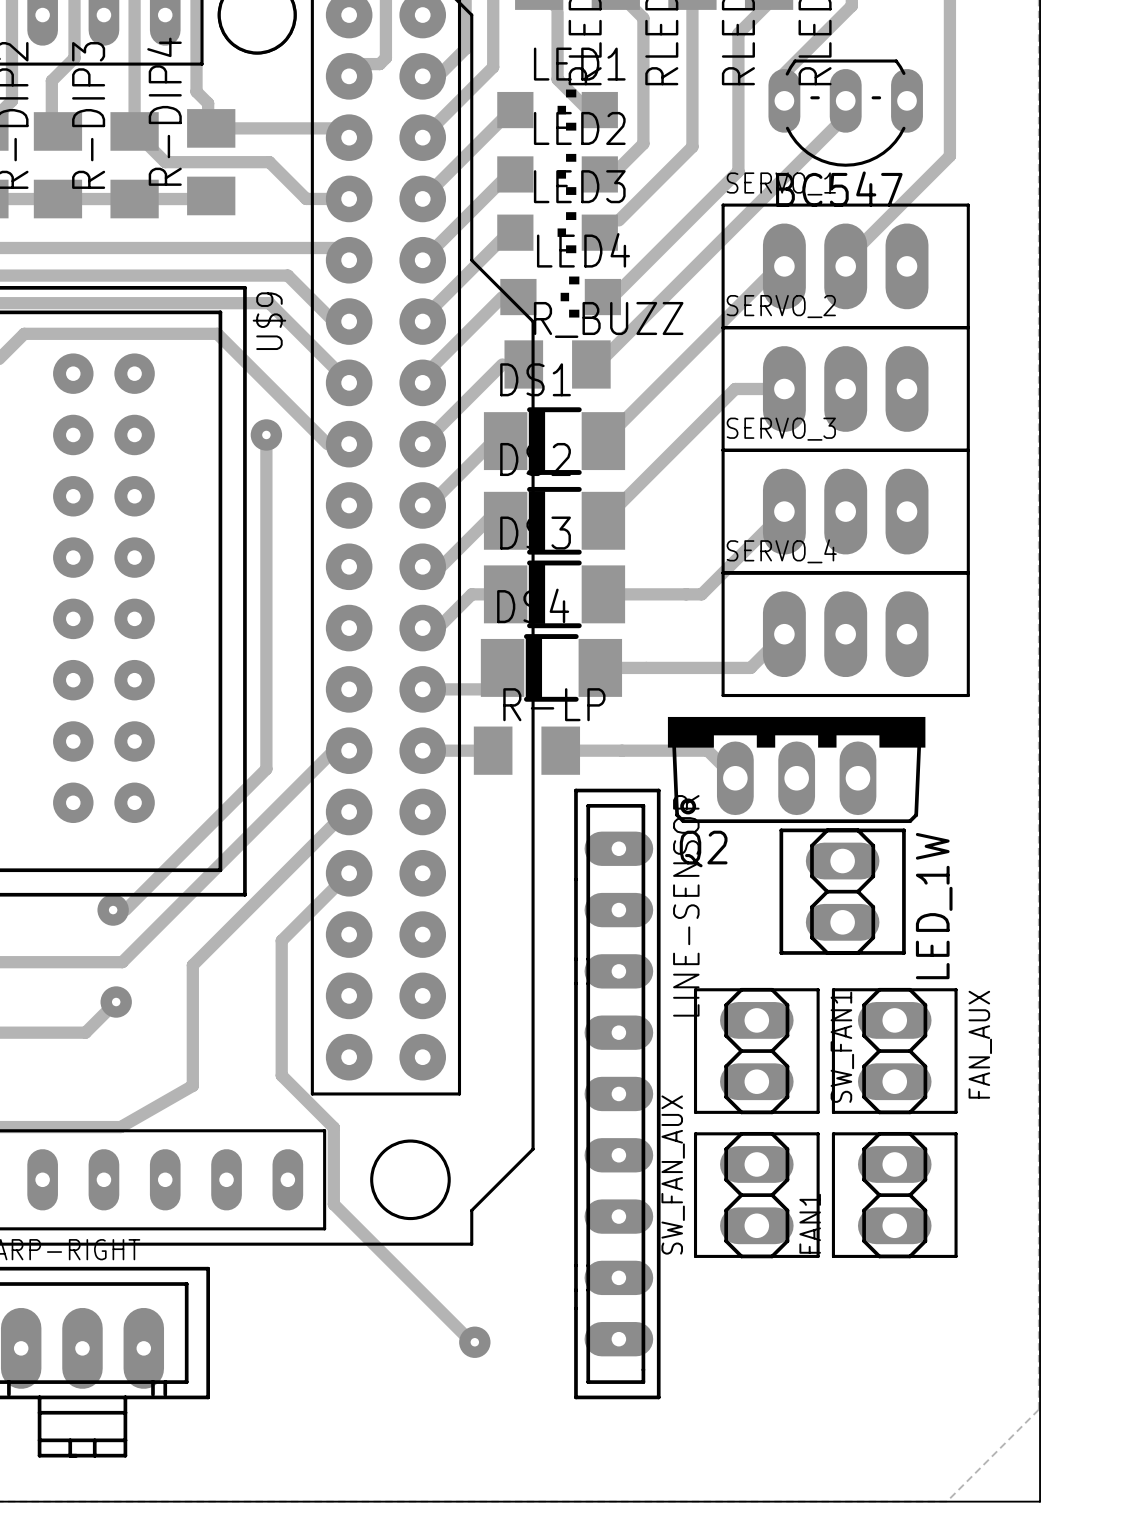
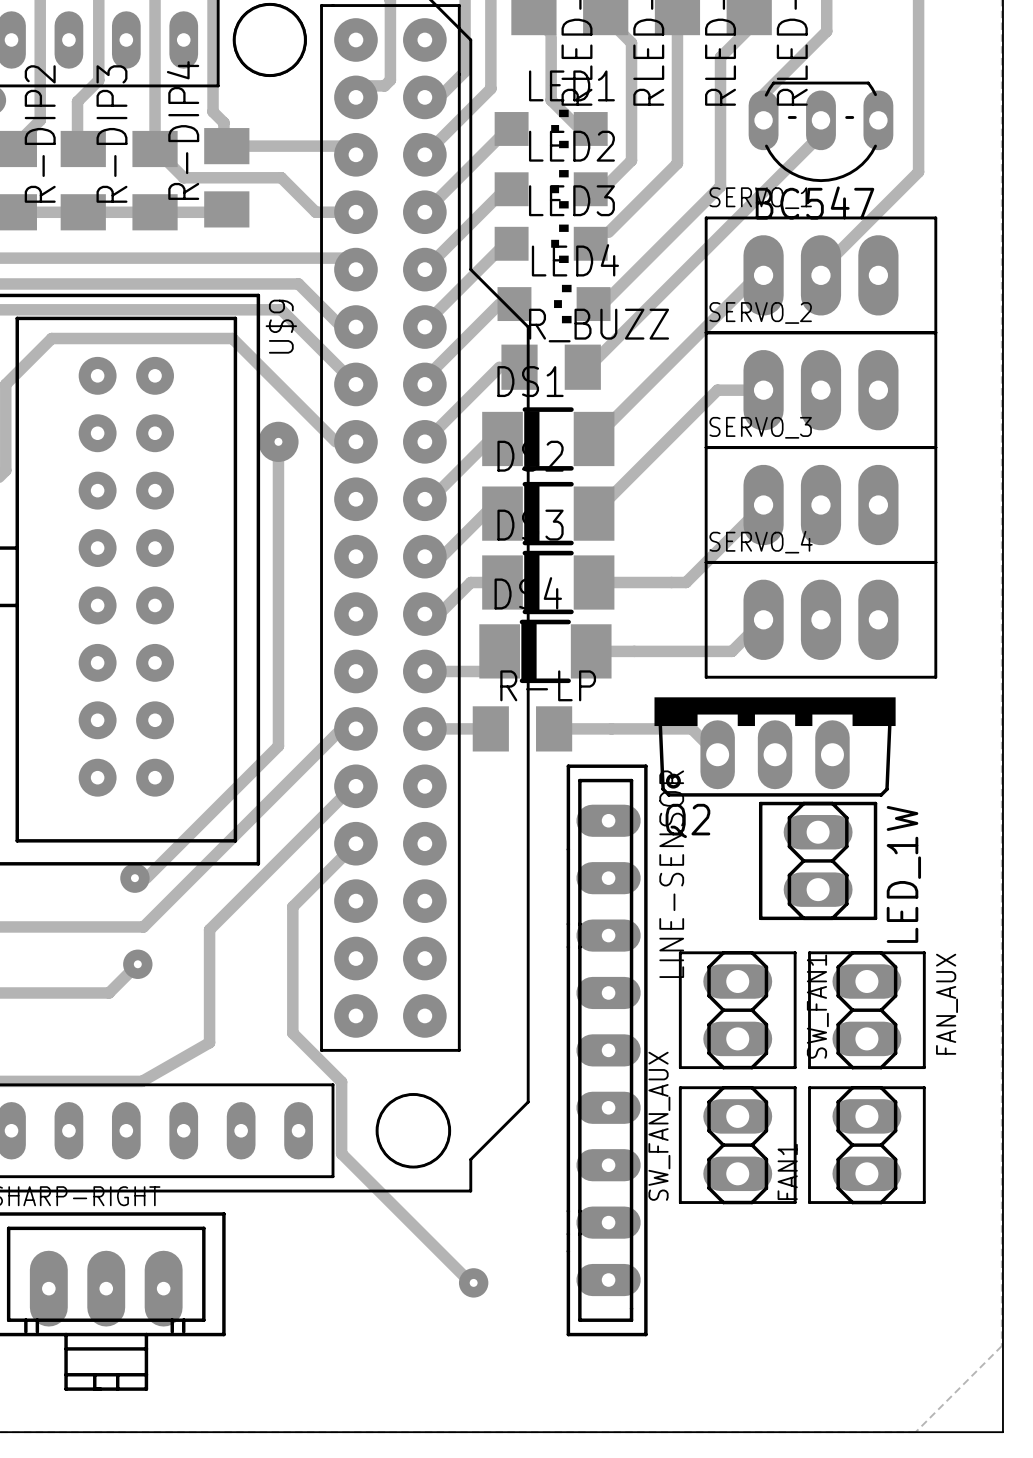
via size: [250, 419, 283, 451] -> [258, 421, 299, 462]

